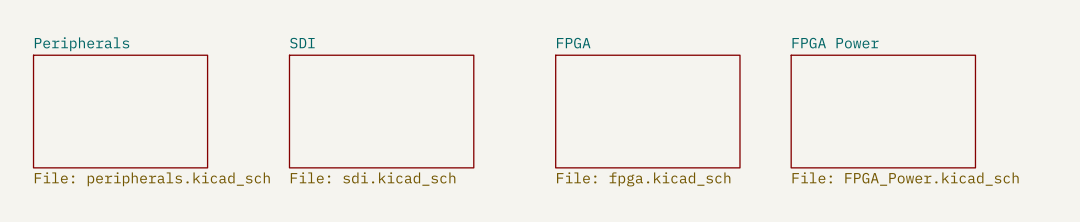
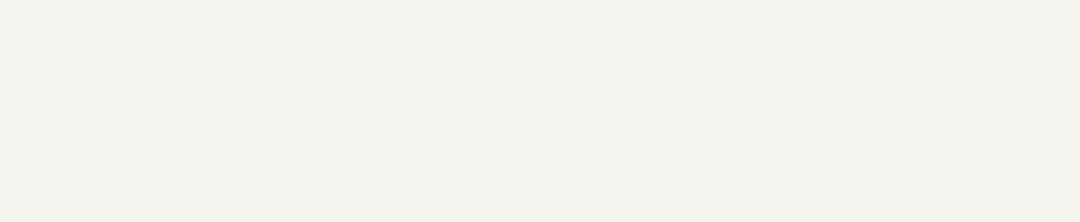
sheet Peripherals: File: peripherals.kicad_sch (120, 111) -> none
sheet SDI: File: sdi.kicad_sch (381, 111) -> none
sheet FPGA: File: fpga.kicad_sch (647, 111) -> none
sheet FPGA Power: File: FPGA_Power.kicad_sch (883, 111) -> none

